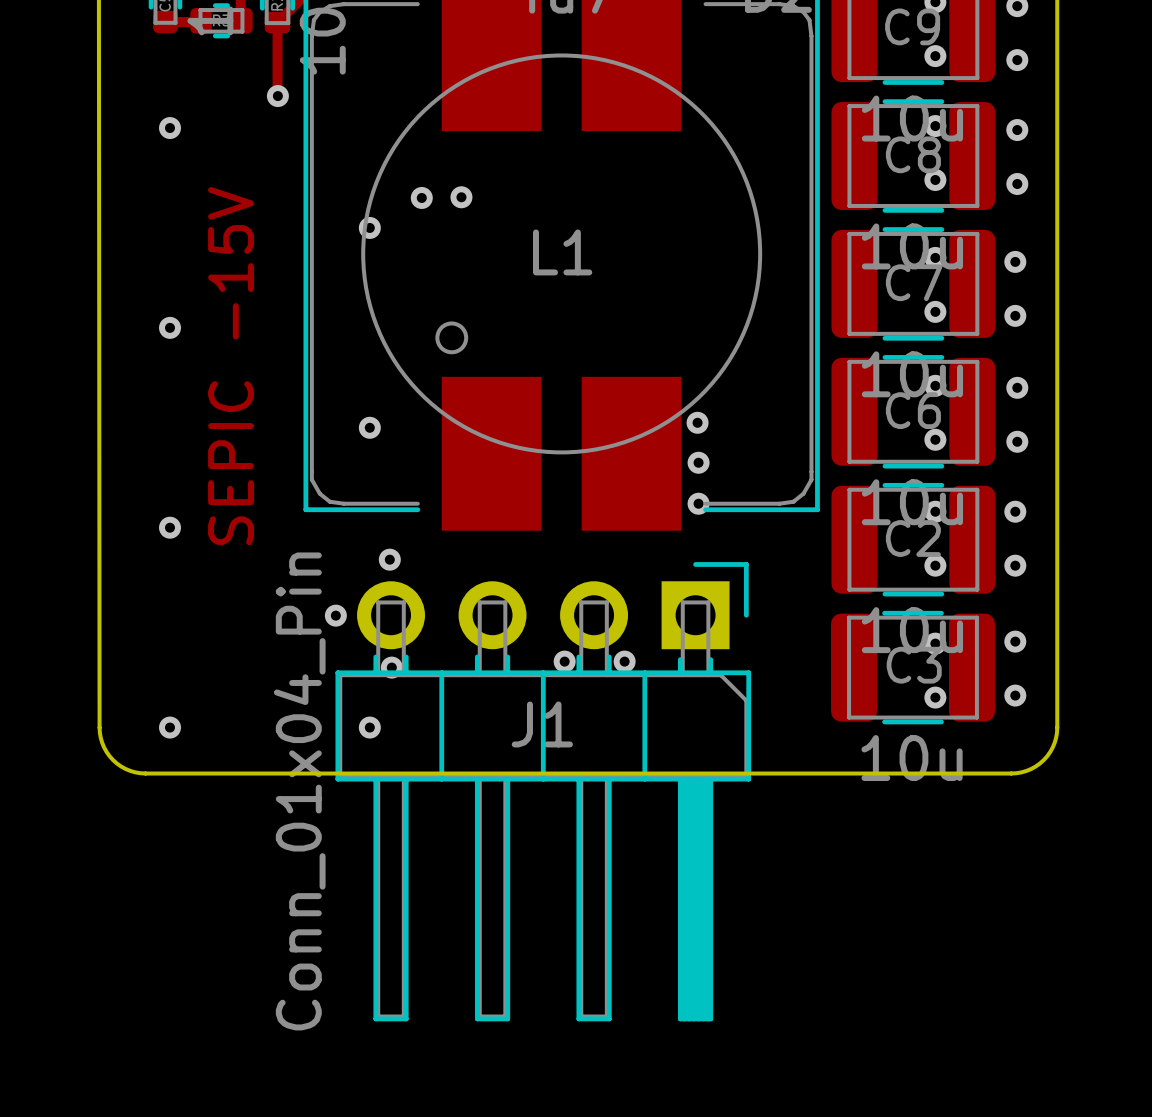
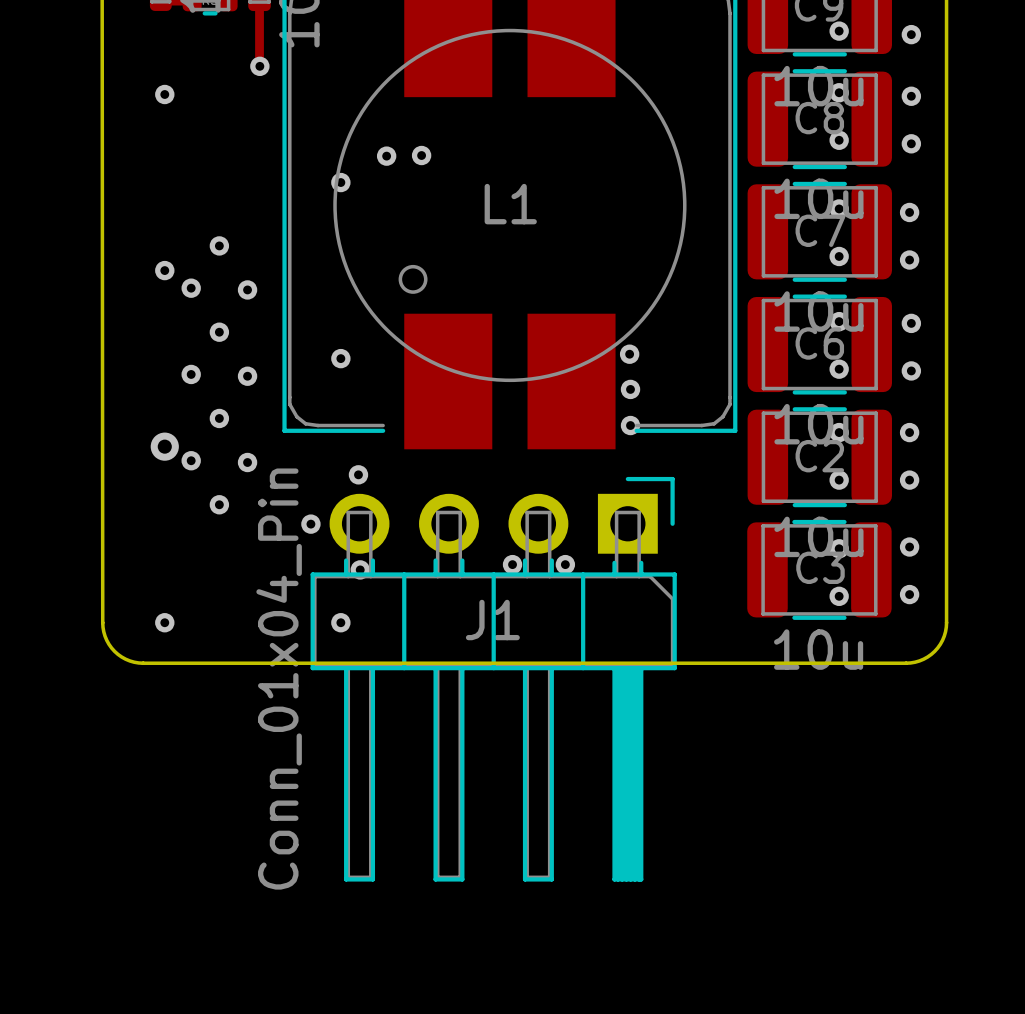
via: none -> (219, 245)
via: none -> (191, 288)
via: none -> (247, 289)
text: SEPIC -15V (231, 366) -> none
via: none -> (219, 332)
via: none -> (191, 374)
via: none -> (247, 376)
via: none -> (219, 418)
via position: (169, 527) -> (191, 460)
via: none -> (164, 446)
via: none -> (247, 462)
via: none -> (219, 504)

